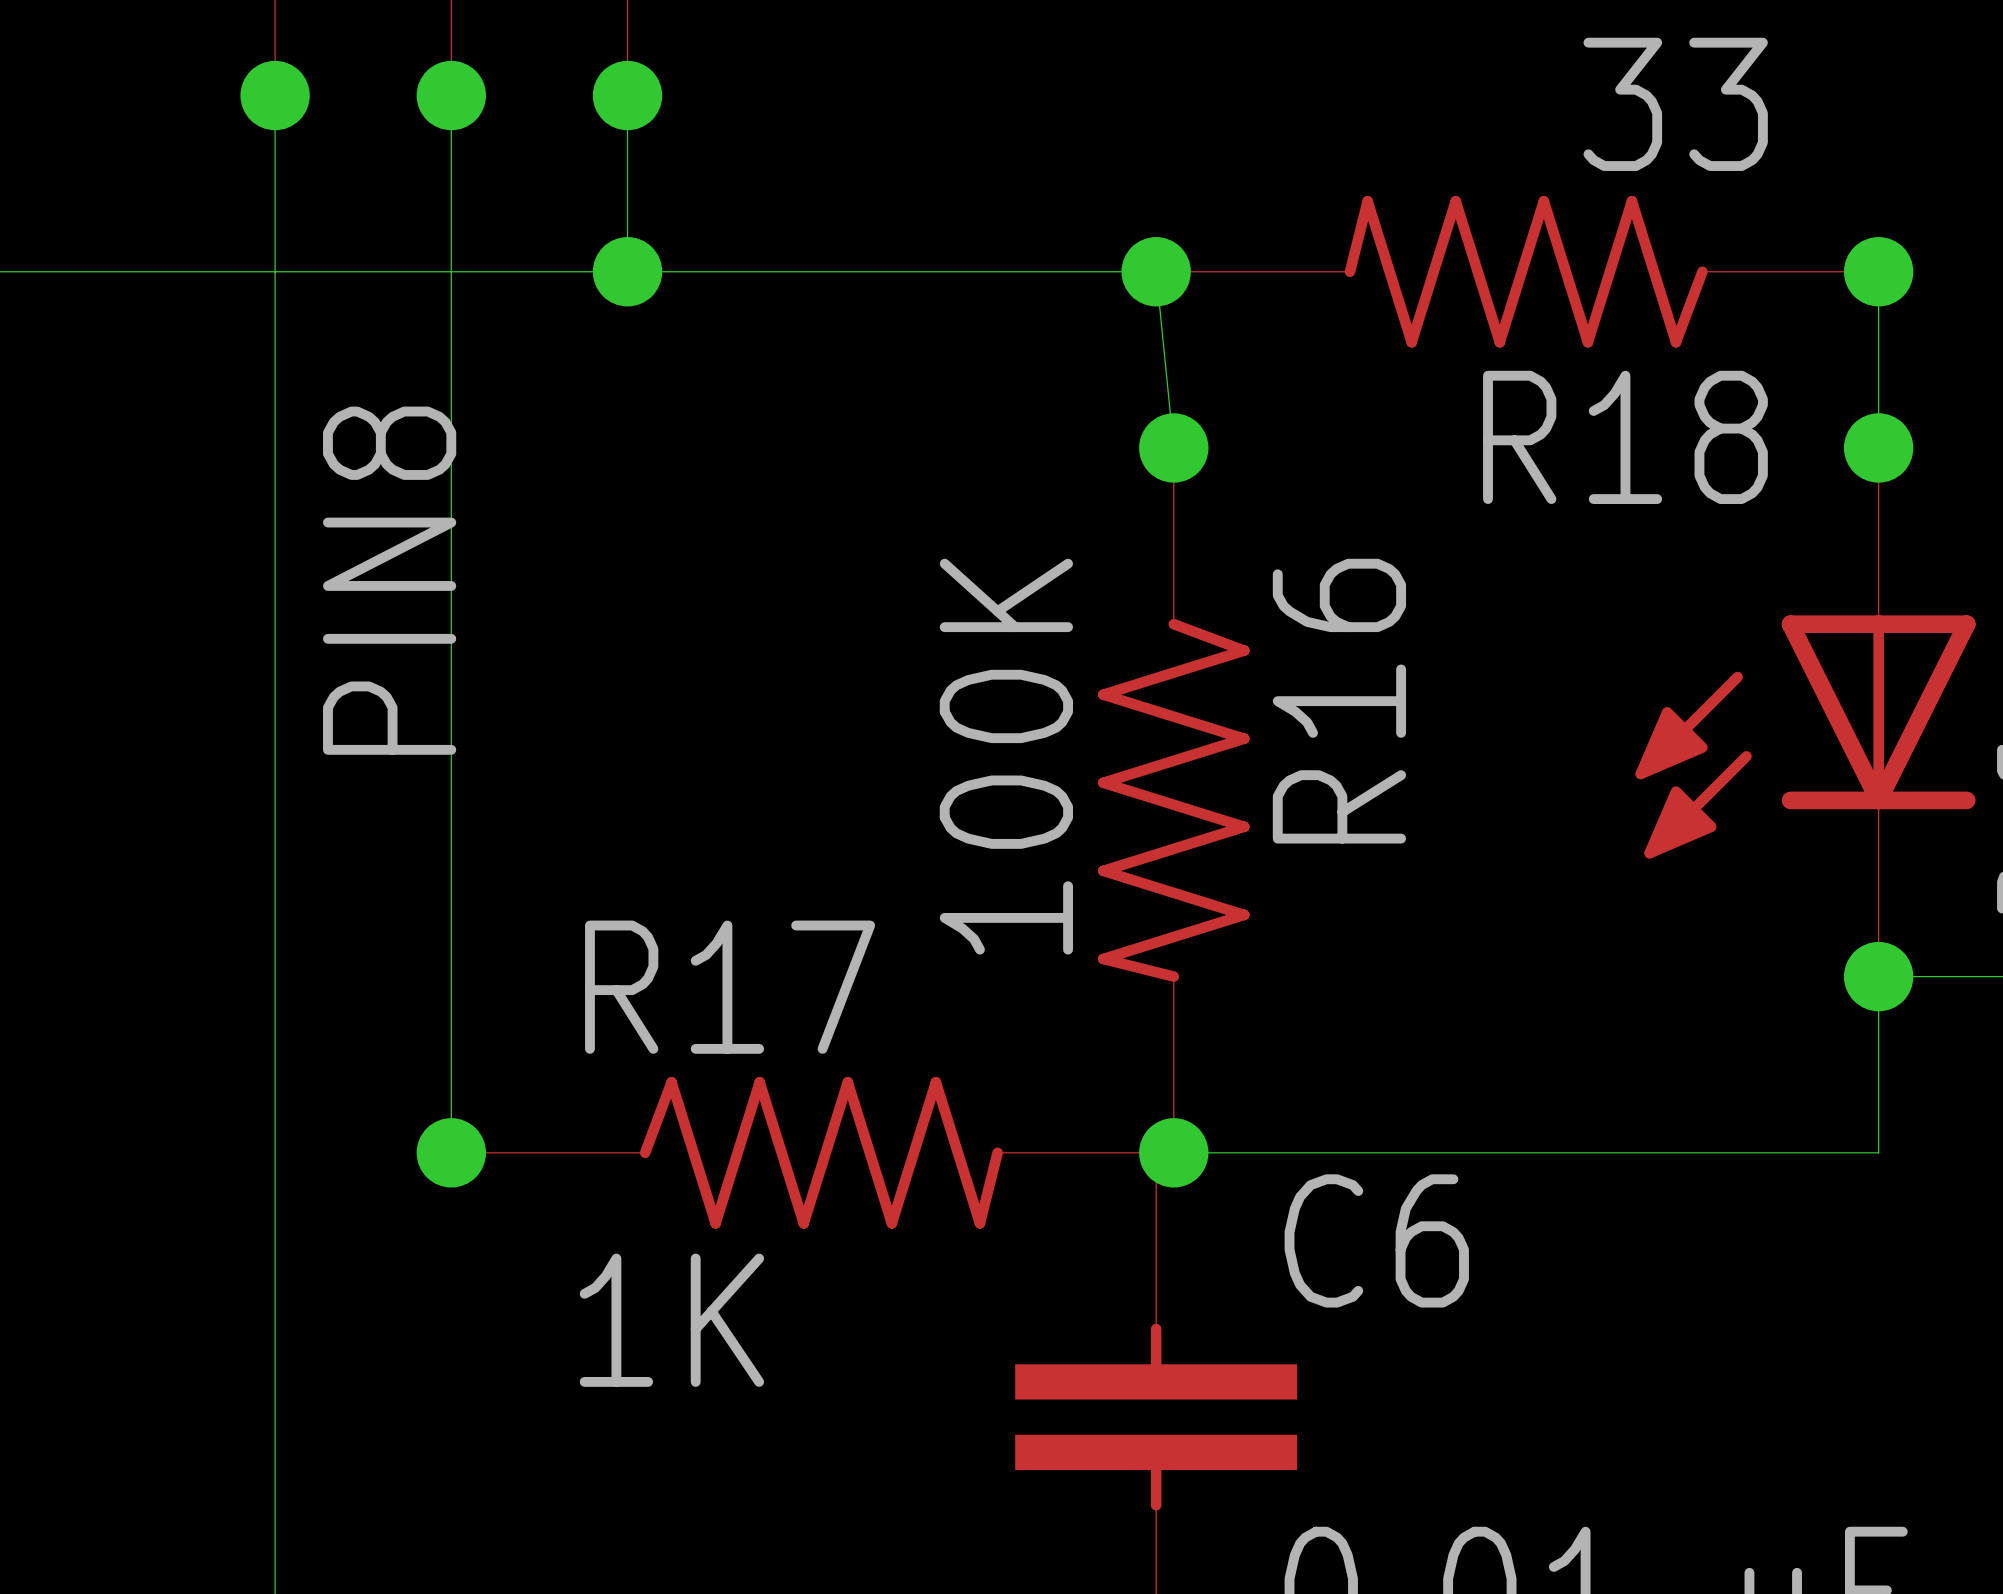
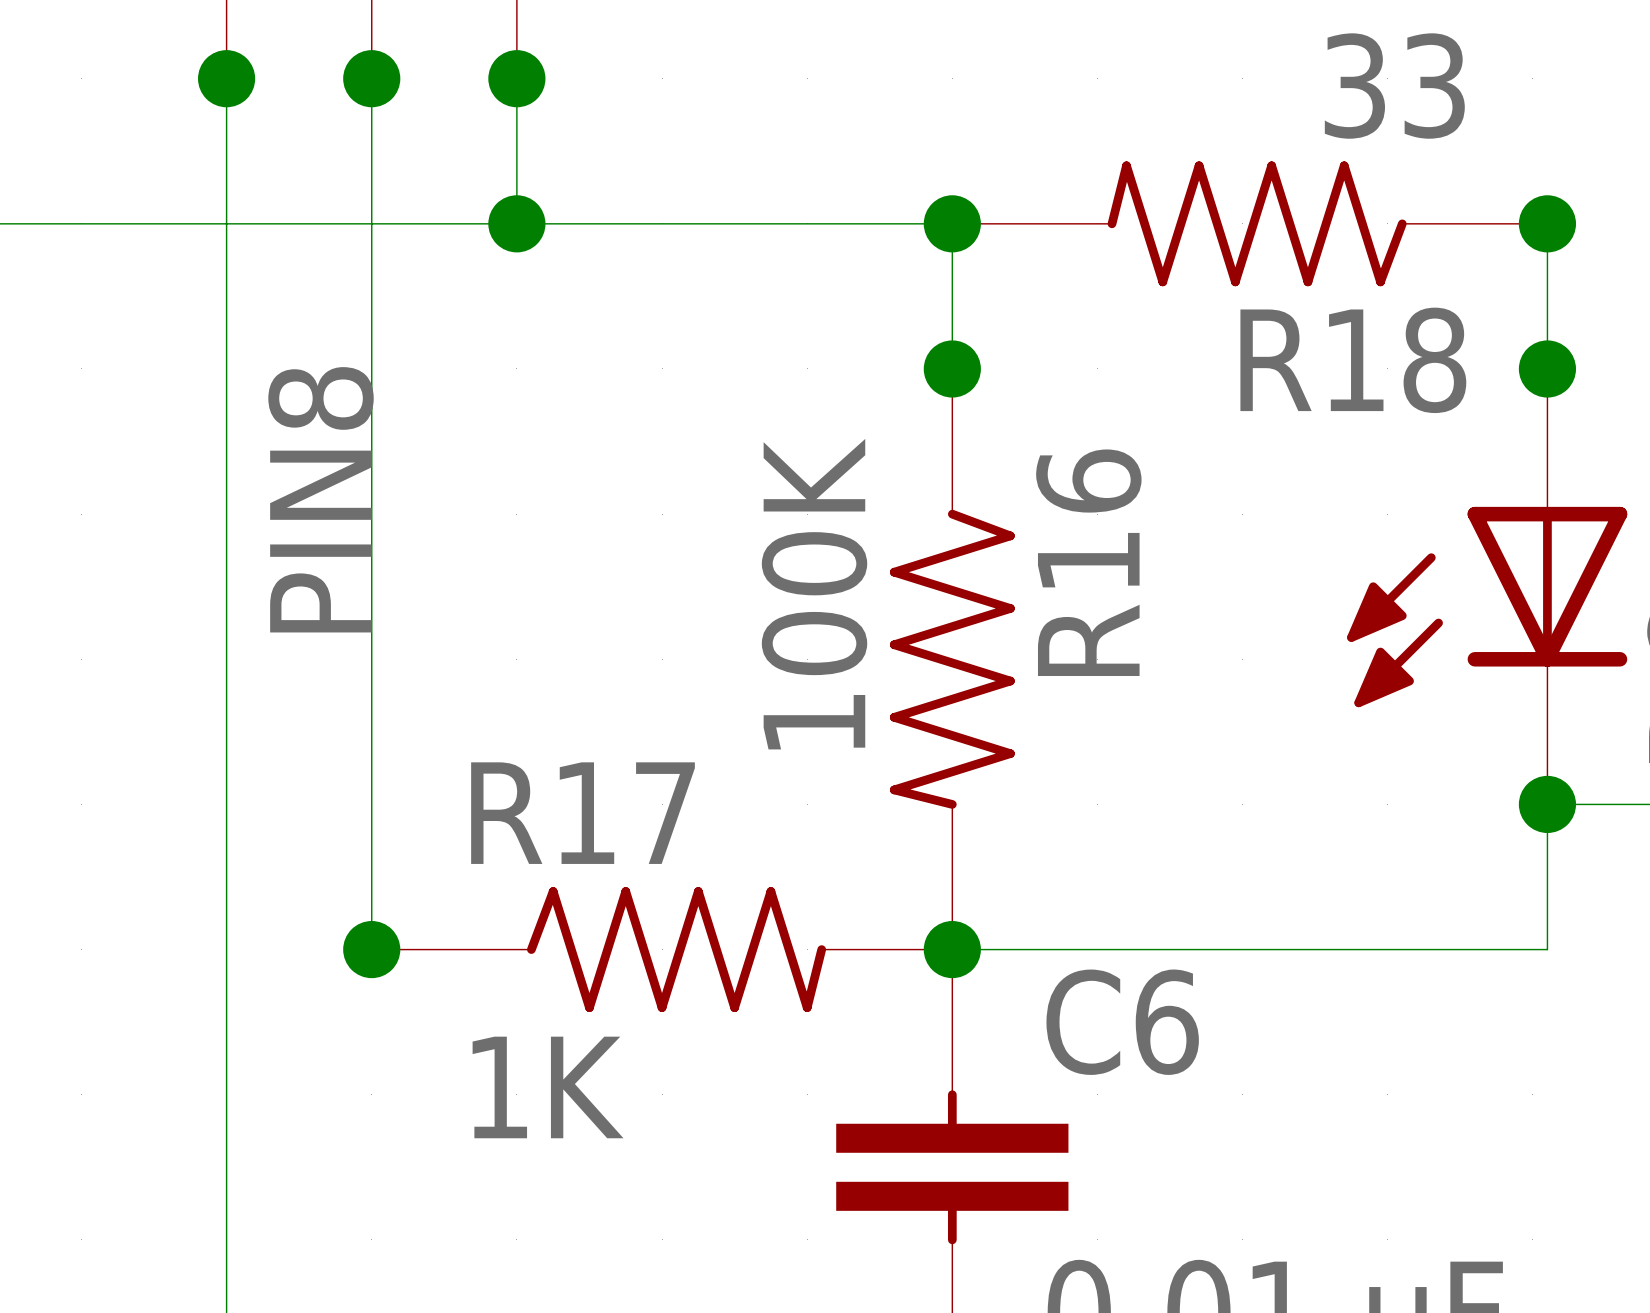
wire: (1156, 271) (1173, 447) -> (952, 223) (952, 368)
junction position: (1173, 447) -> (952, 368)
R16 position: (1173, 800) -> (952, 659)
junction position: (1173, 1152) -> (952, 949)

